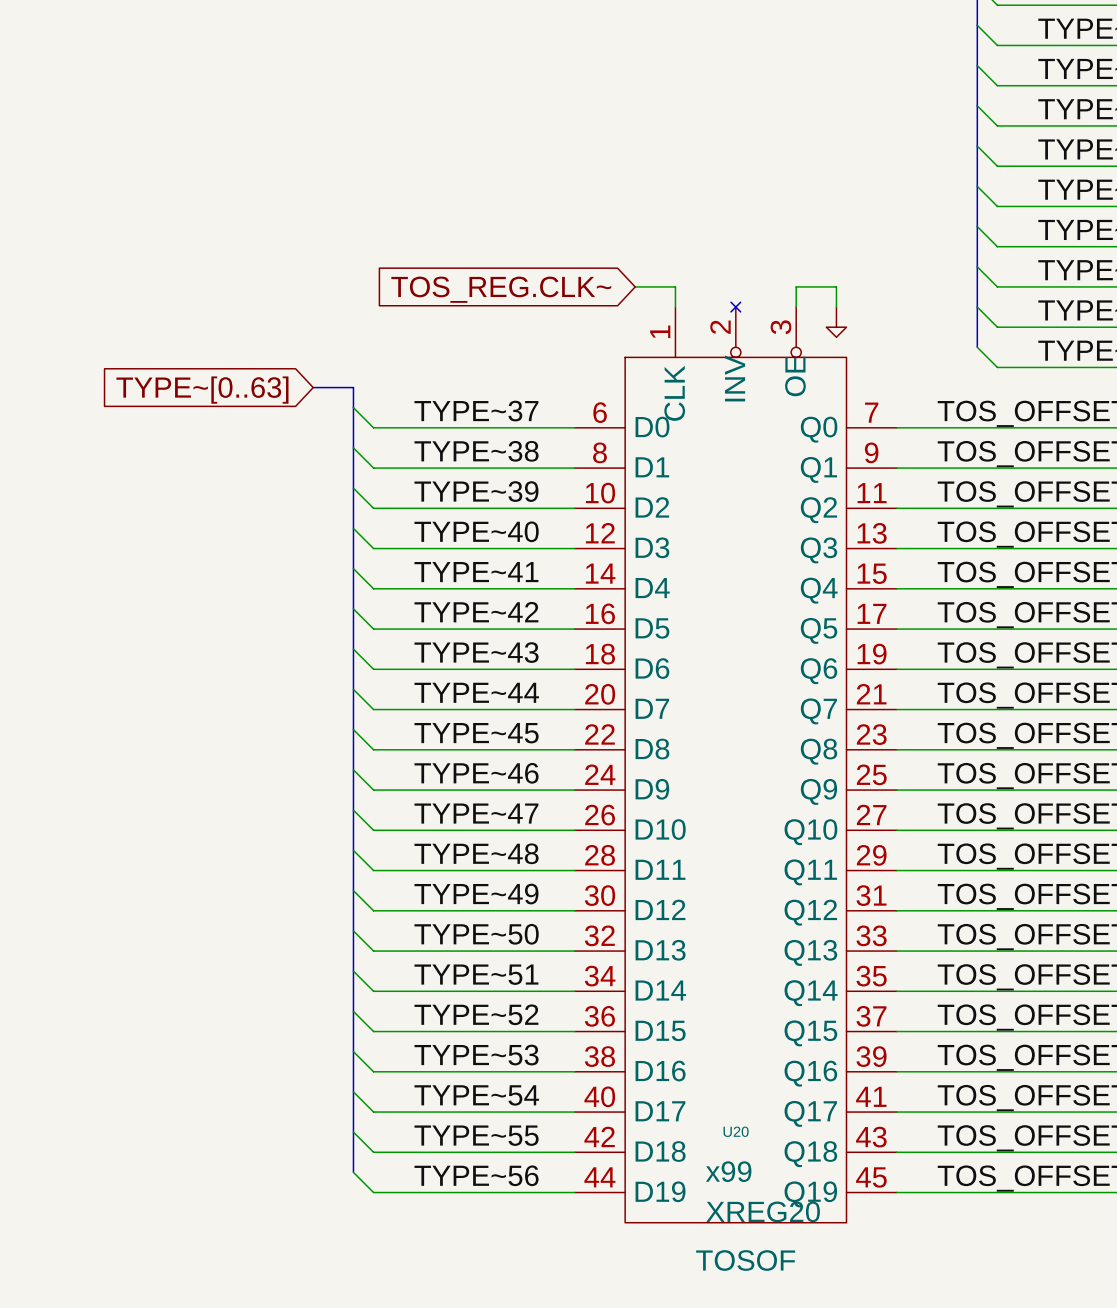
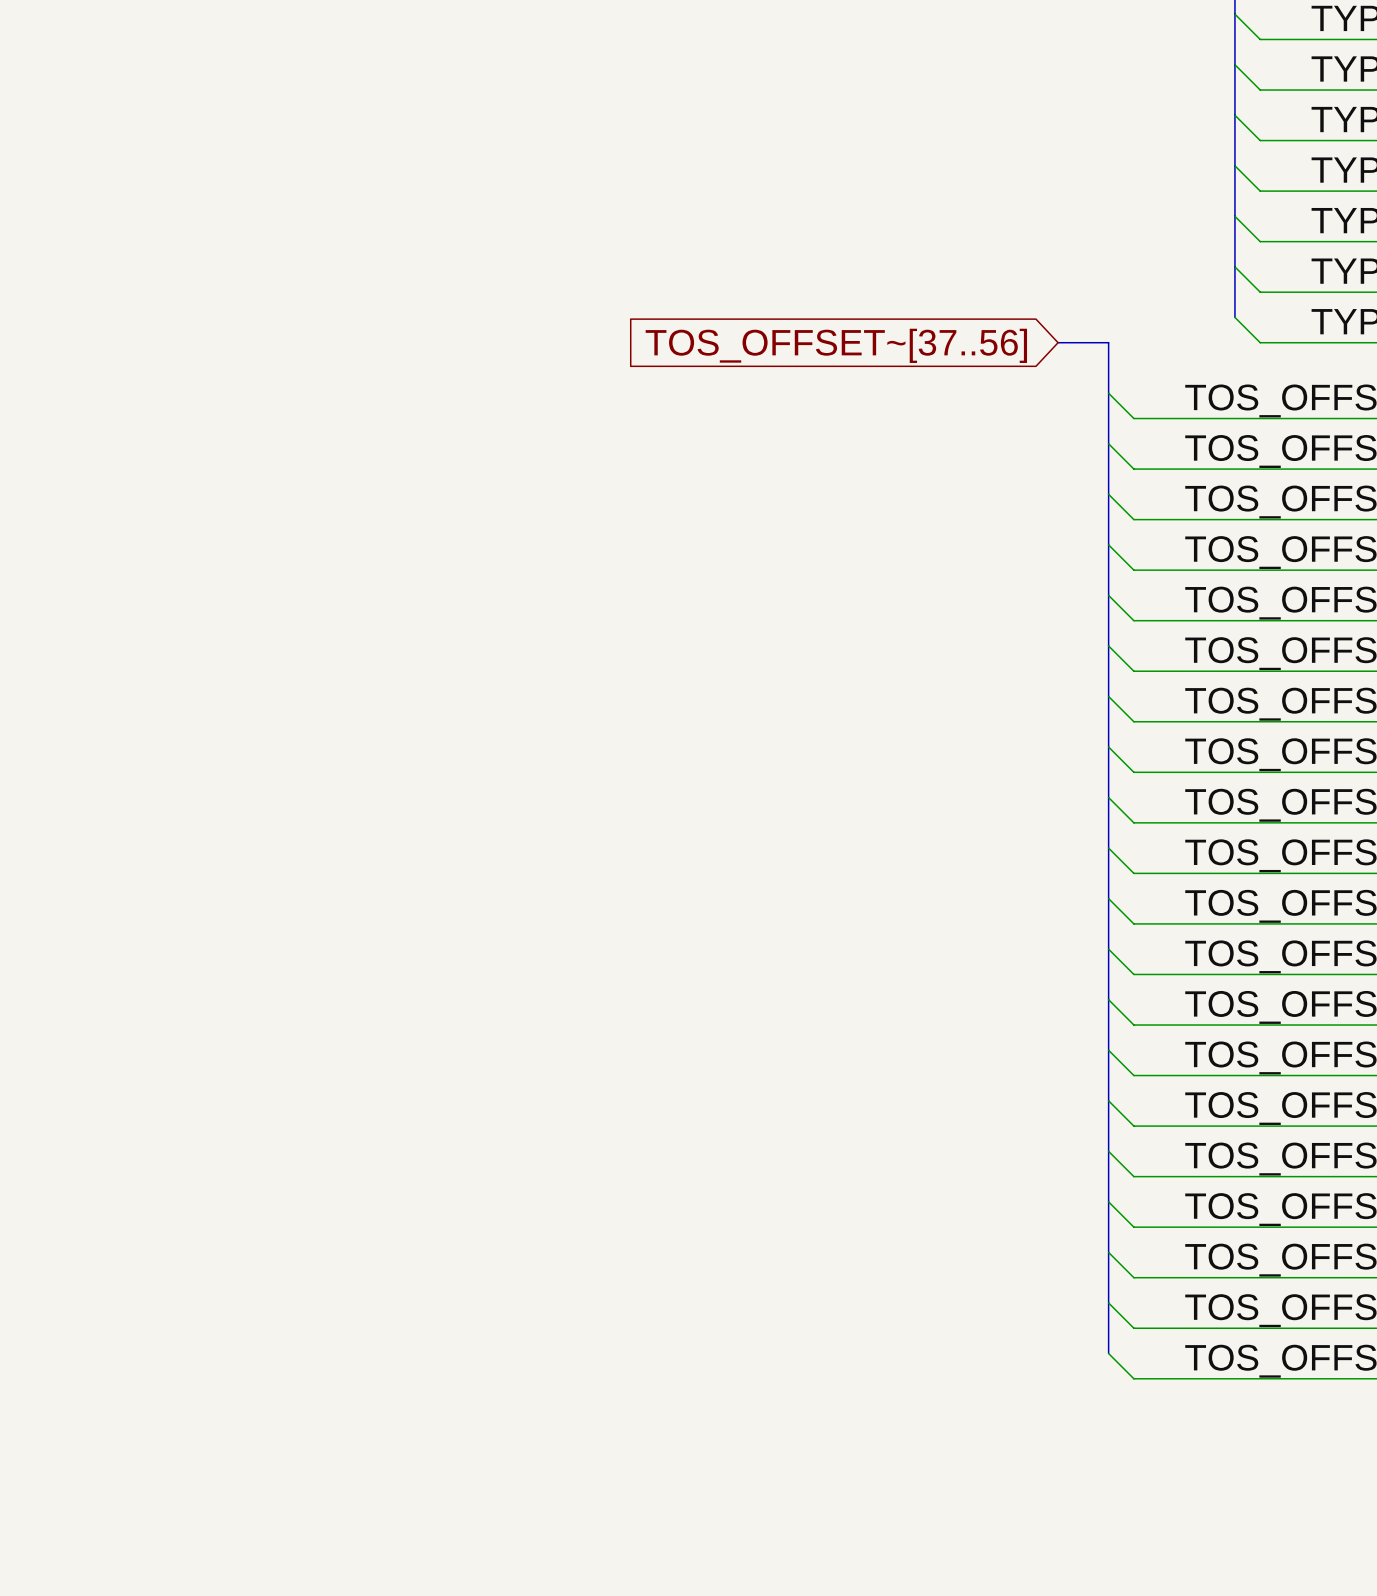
wire: (635, 286) (675, 286) (675, 307) -> none
global label: TOS_REG.CLK~ (501, 289) -> none
no-connect mark: (735, 307) -> none
wire: (796, 307) (796, 286) (836, 286) (836, 307) -> none
power symbol: (836, 322) -> none
bus: none -> (1058, 342) (1108, 342) (1108, 1353)
global label: none -> TOS_OFFSET~[37..56] (836, 345)
bus: (313, 387) (353, 387) (353, 1172) -> none
global label: TYPE~[0..63] (202, 390) -> none
wire: (353, 407) (373, 427) (574, 427) -> none
wire: none -> (1108, 393) (1133, 418)
label: TYPE~37 (476, 411) -> none
wire: (353, 447) (373, 468) (574, 468) -> none
wire: none -> (1108, 443) (1133, 469)
label: TYPE~38 (476, 451) -> none
wire: (353, 488) (373, 508) (574, 508) -> none
wire: none -> (1108, 494) (1133, 519)
label: TYPE~39 (476, 491) -> none
wire: (353, 528) (373, 548) (574, 548) -> none
wire: none -> (1108, 544) (1133, 570)
label: TYPE~40 (476, 531) -> none
wire: (353, 568) (373, 588) (574, 588) -> none
wire: none -> (1108, 595) (1133, 620)
label: TYPE~41 (476, 572) -> none
wire: (353, 608) (373, 629) (574, 629) -> none
wire: none -> (1108, 645) (1133, 671)
label: TYPE~42 (476, 612) -> none
wire: (353, 649) (373, 669) (574, 669) -> none
wire: none -> (1108, 696) (1133, 721)
label: TYPE~43 (476, 652) -> none
wire: (353, 689) (373, 709) (574, 709) -> none
wire: none -> (1108, 747) (1133, 772)
label: TYPE~44 (476, 692) -> none
wire: (353, 729) (373, 749) (574, 749) -> none
wire: none -> (1108, 797) (1133, 822)
label: TYPE~45 (476, 733) -> none
U20: XREG20 (735, 764) -> none
wire: (353, 769) (373, 790) (574, 790) -> none
wire: none -> (1108, 848) (1133, 873)
label: TYPE~46 (476, 773) -> none
wire: (353, 810) (373, 830) (574, 830) -> none
wire: none -> (1108, 898) (1133, 923)
label: TYPE~47 (476, 813) -> none
wire: (353, 850) (373, 870) (574, 870) -> none
wire: none -> (1108, 949) (1133, 974)
label: TYPE~48 (476, 853) -> none
wire: (353, 890) (373, 910) (574, 910) -> none
wire: none -> (1108, 999) (1133, 1025)
label: TYPE~49 (476, 894) -> none
wire: (353, 930) (373, 951) (574, 951) -> none
wire: none -> (1108, 1050) (1133, 1075)
label: TYPE~50 (476, 934) -> none
wire: (353, 971) (373, 991) (574, 991) -> none
wire: none -> (1108, 1100) (1133, 1126)
label: TYPE~51 (476, 974) -> none
wire: (353, 1011) (373, 1031) (574, 1031) -> none
wire: none -> (1108, 1151) (1133, 1176)
label: TYPE~52 (476, 1014) -> none
wire: (353, 1051) (373, 1071) (574, 1071) -> none
wire: none -> (1108, 1201) (1133, 1227)
label: TYPE~53 (476, 1055) -> none
wire: (353, 1091) (373, 1112) (574, 1112) -> none
wire: none -> (1108, 1252) (1133, 1277)
label: TYPE~54 (476, 1095) -> none
wire: (353, 1132) (373, 1152) (574, 1152) -> none
wire: none -> (1108, 1302) (1133, 1328)
label: TYPE~55 (476, 1135) -> none
wire: (353, 1172) (373, 1192) (574, 1192) -> none
wire: none -> (1108, 1353) (1133, 1378)
label: TYPE~56 (476, 1175) -> none

